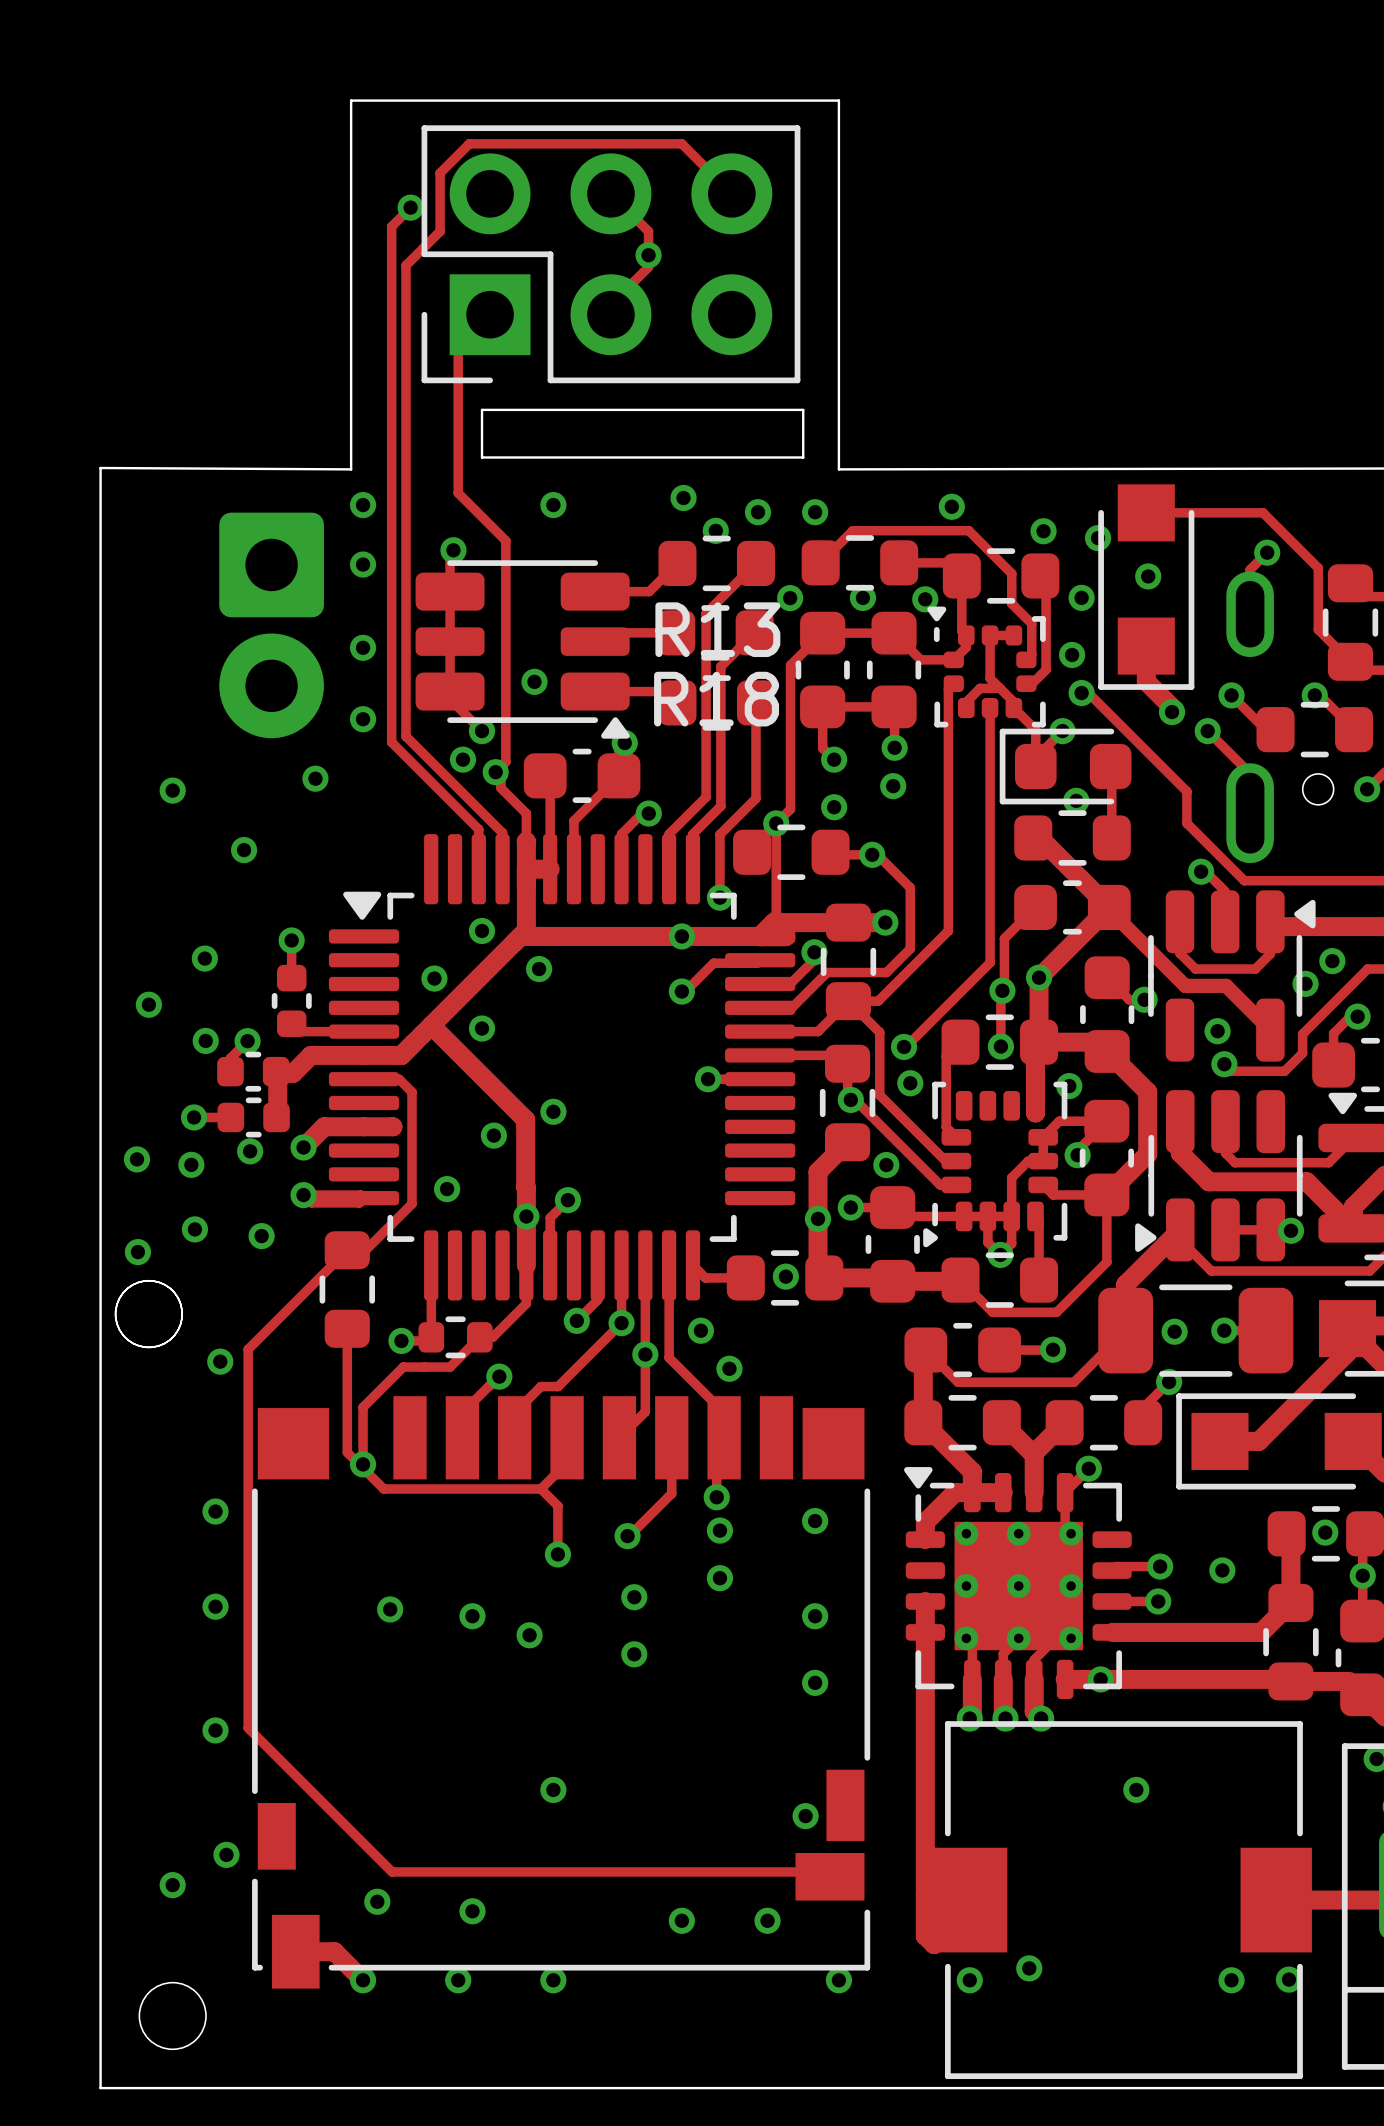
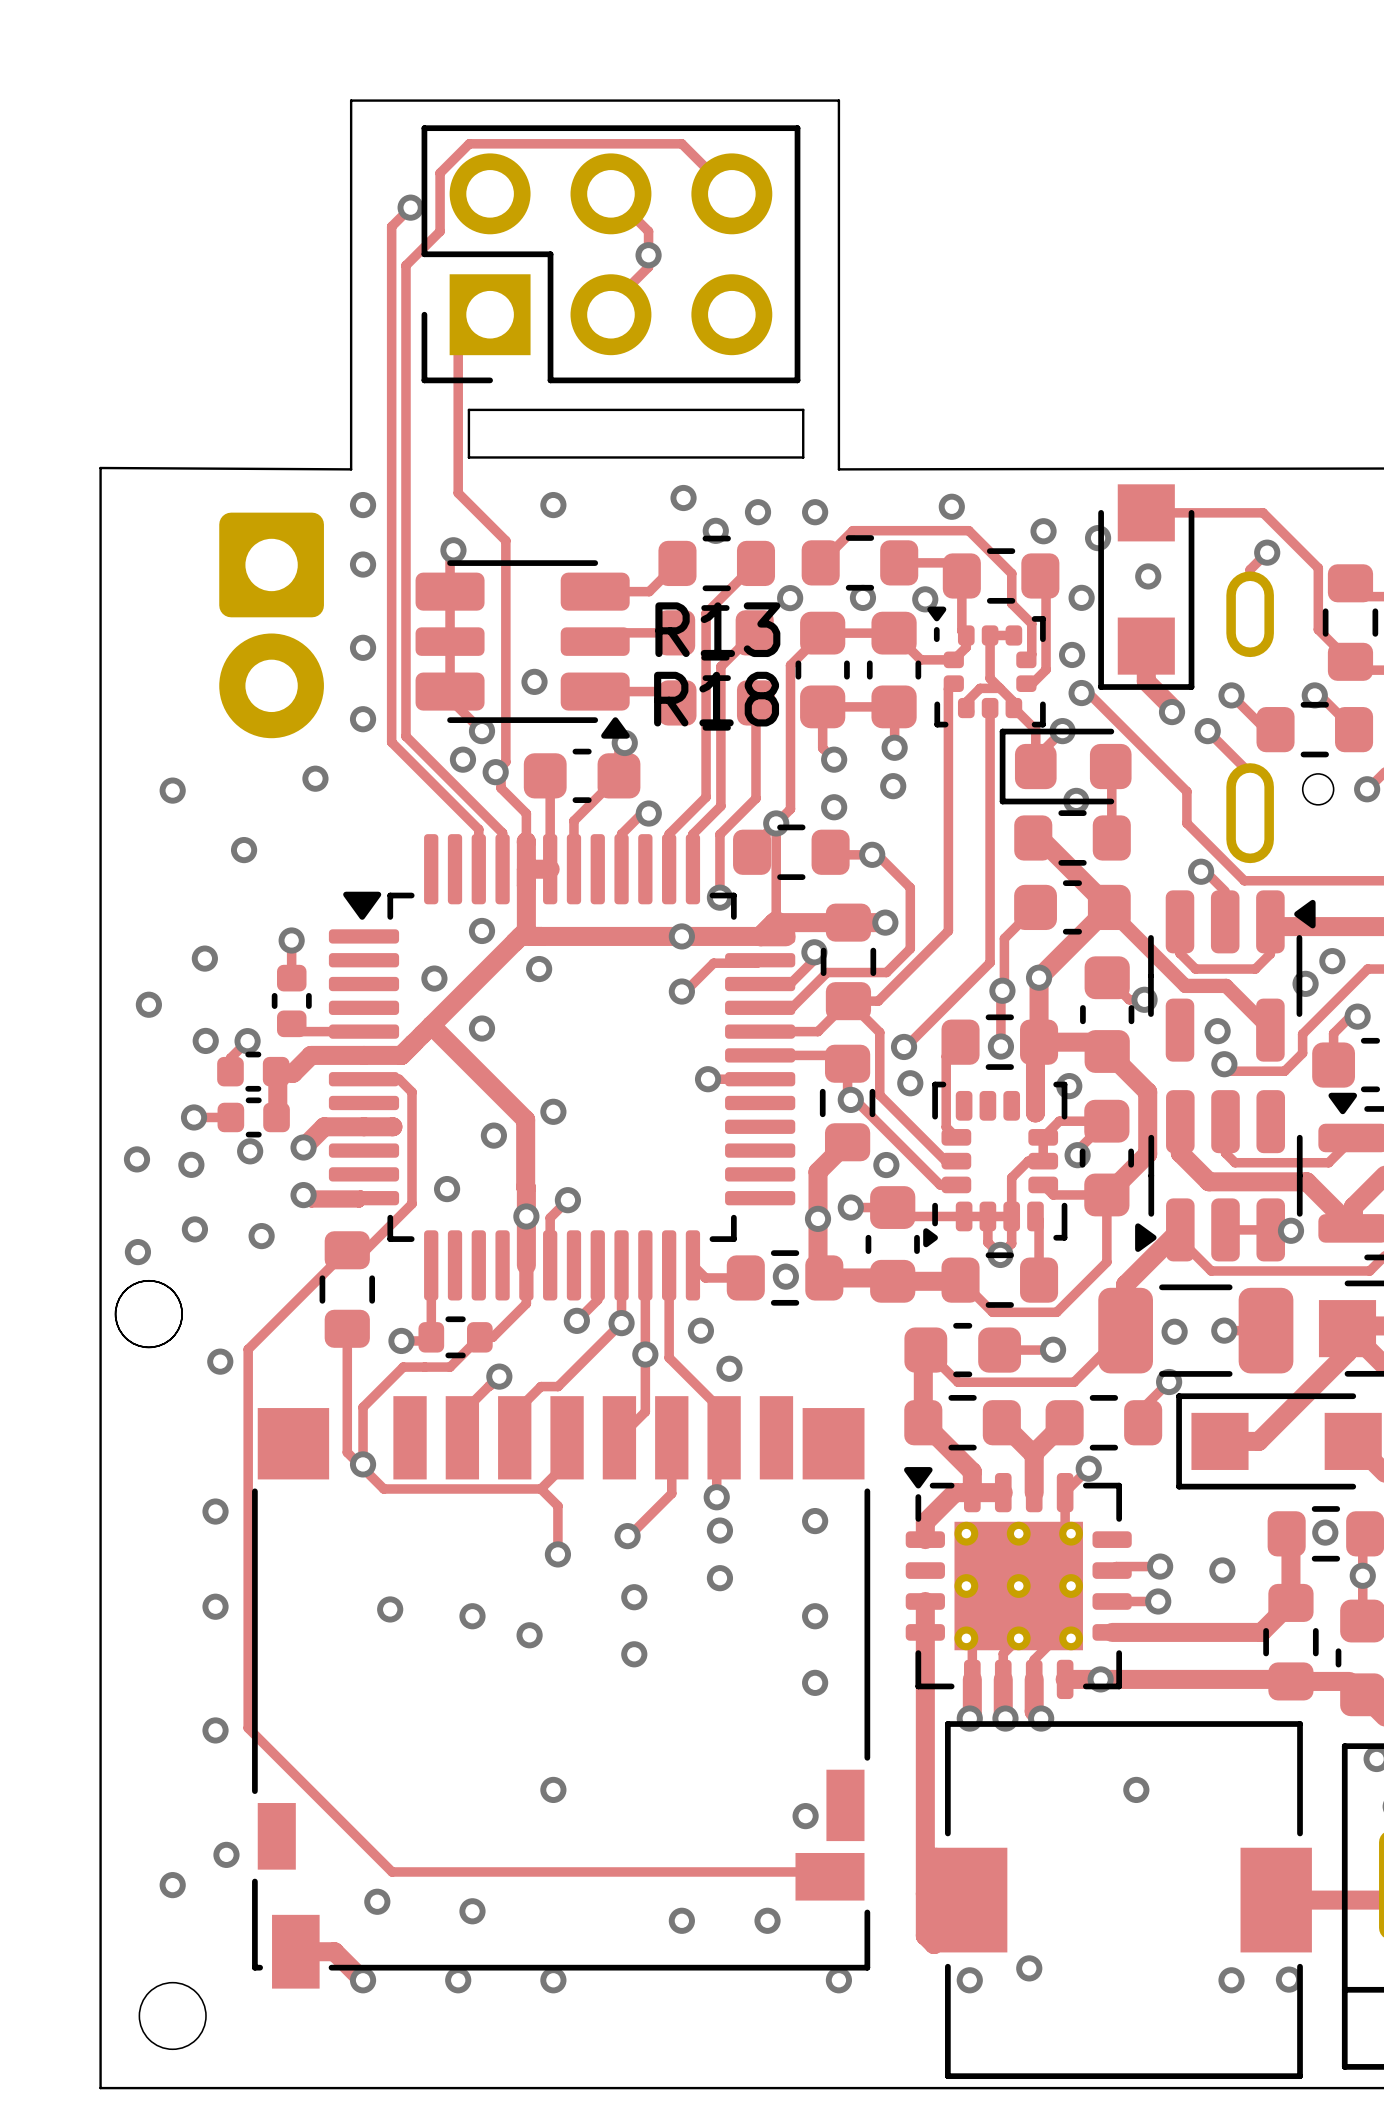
board edge: (482, 409) (482, 457) -> (482, 409) (468, 409) (468, 457) (482, 457)

